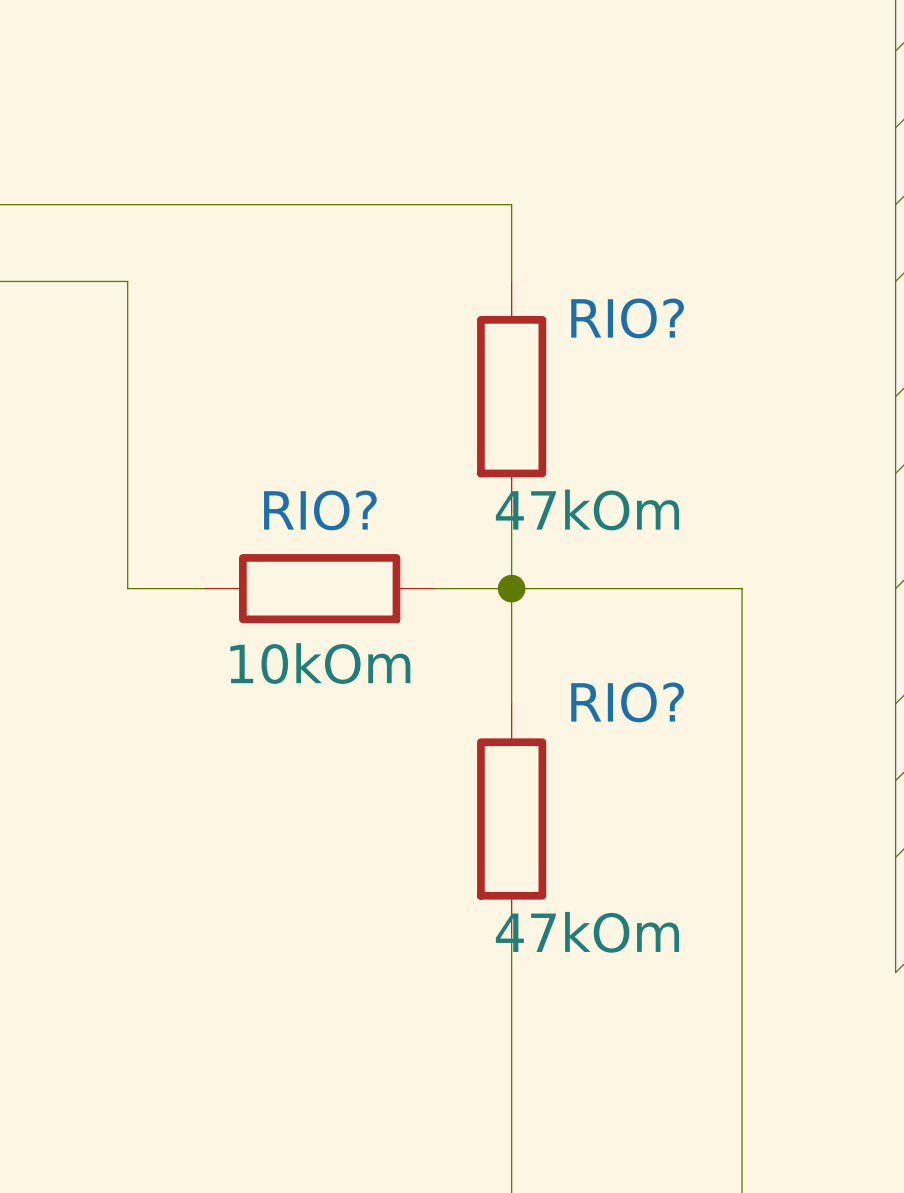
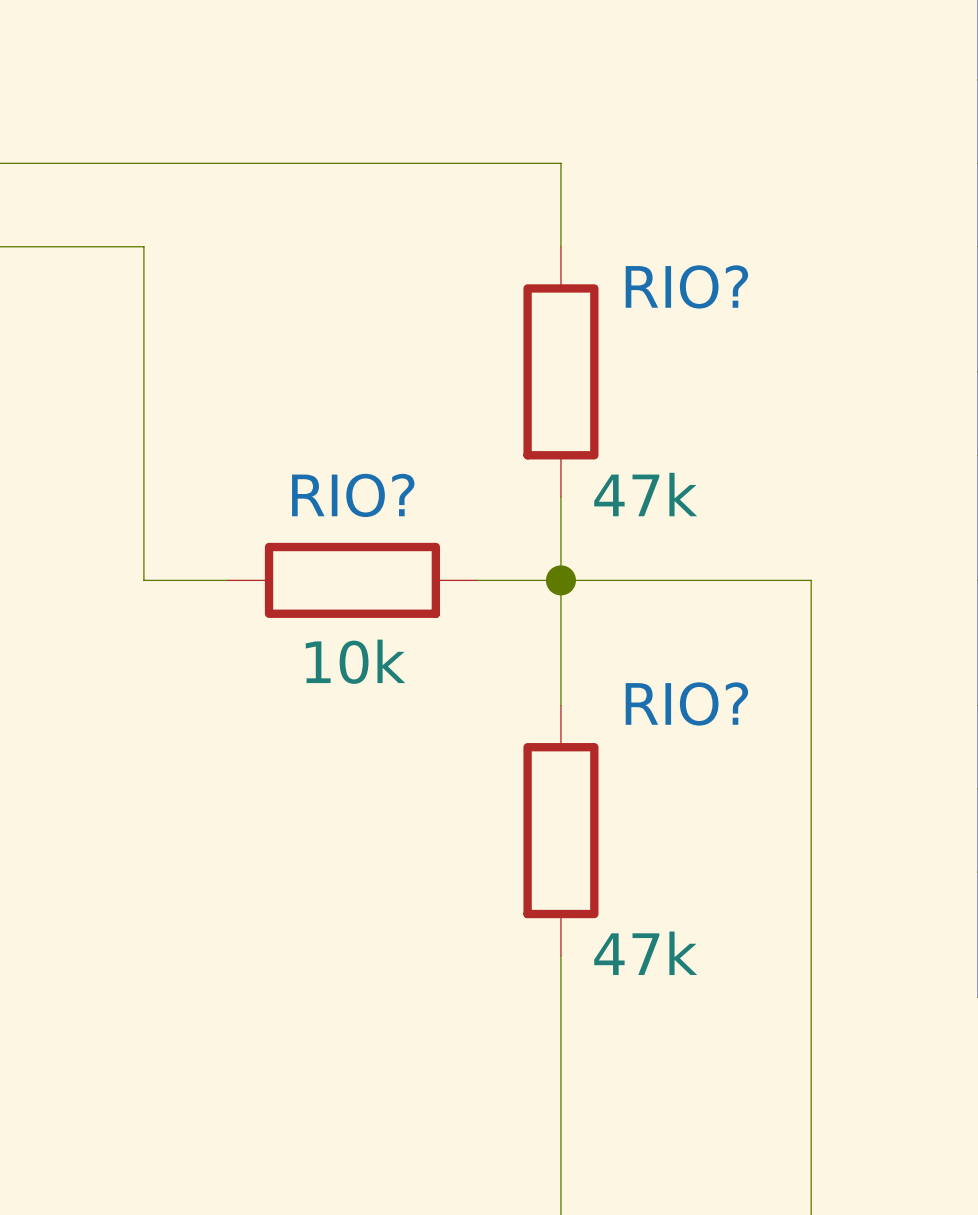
RIO? value: 47kOm (587, 509) -> 47k (645, 494)
RIO? value: 10kOm (320, 663) -> 10k (355, 661)
RIO? value: 47kOm (587, 932) -> 47k (645, 953)

